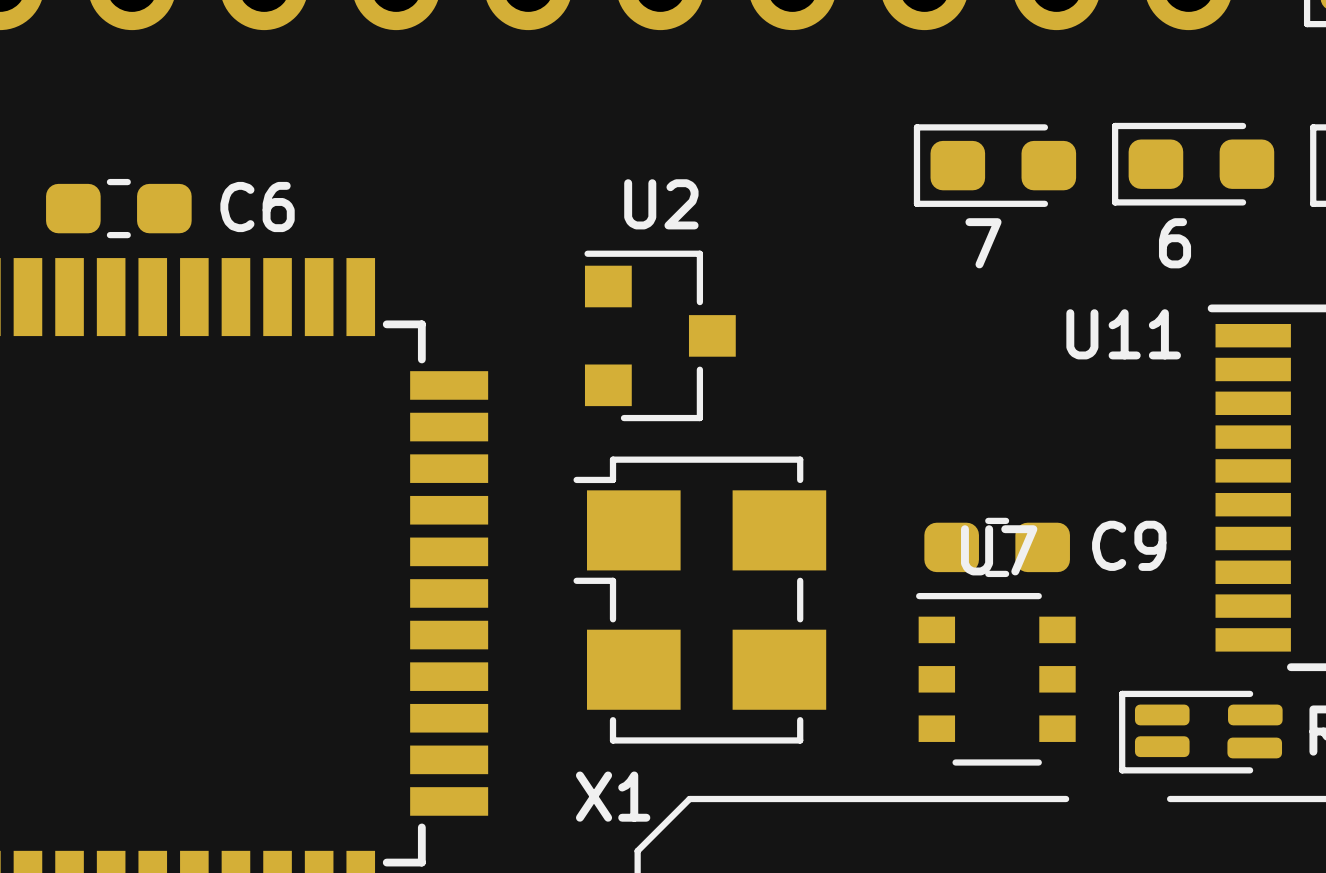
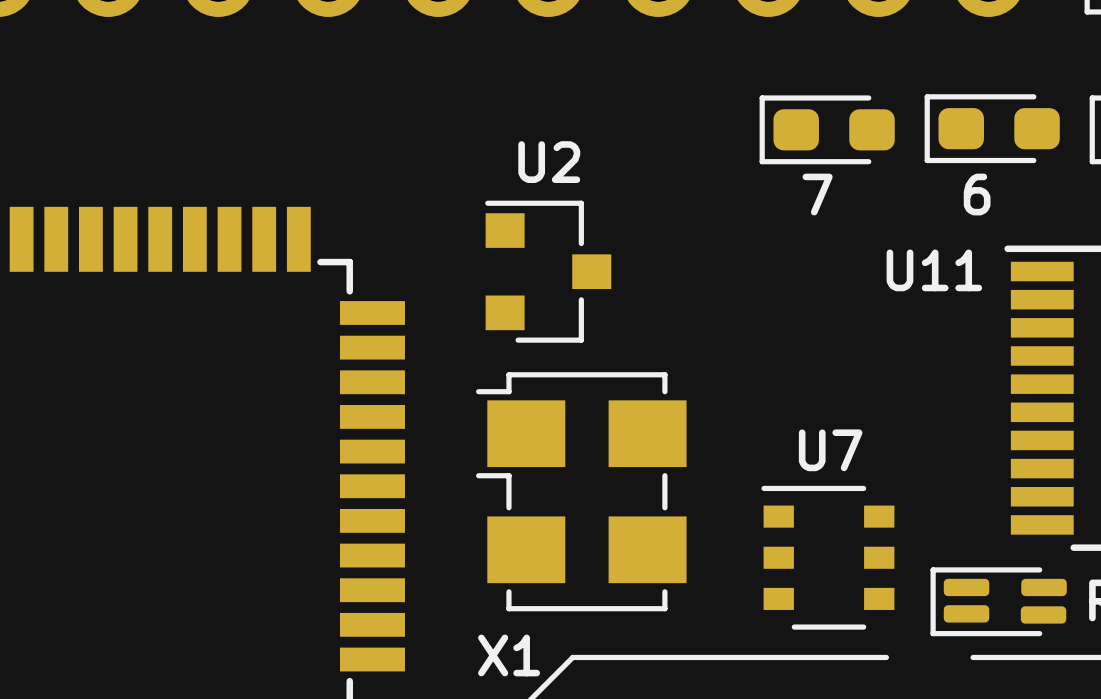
C6: (118, 208) -> none
C9: (997, 547) -> none

